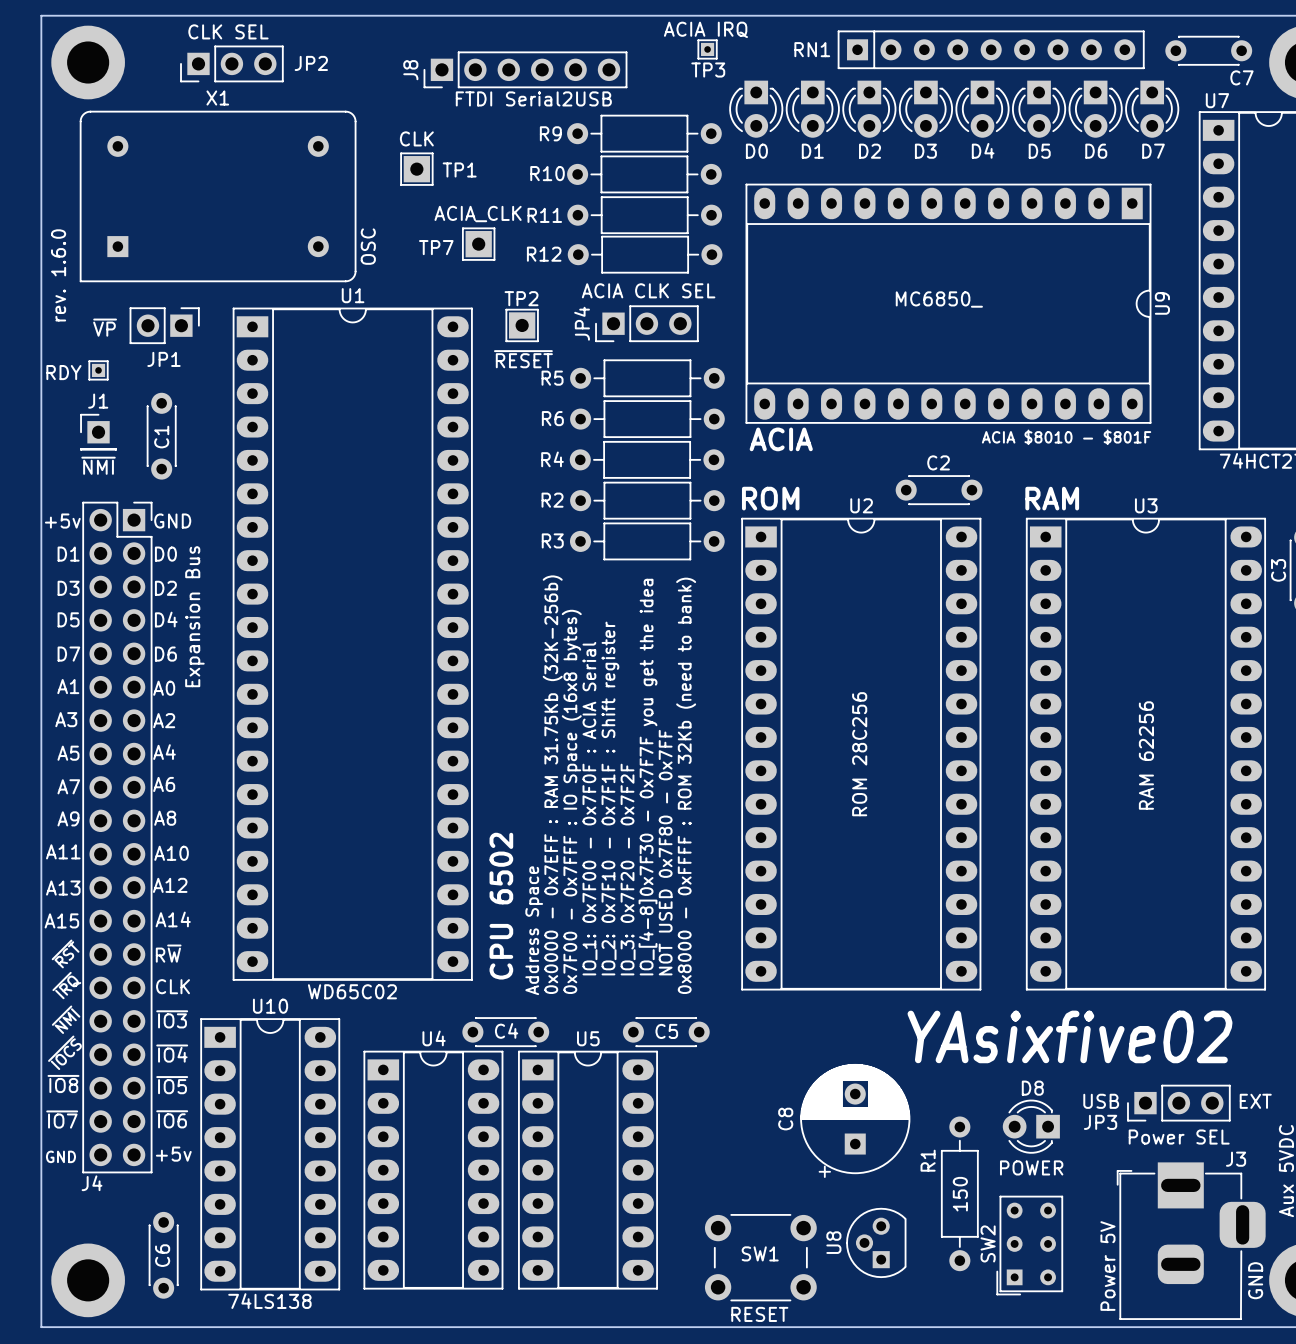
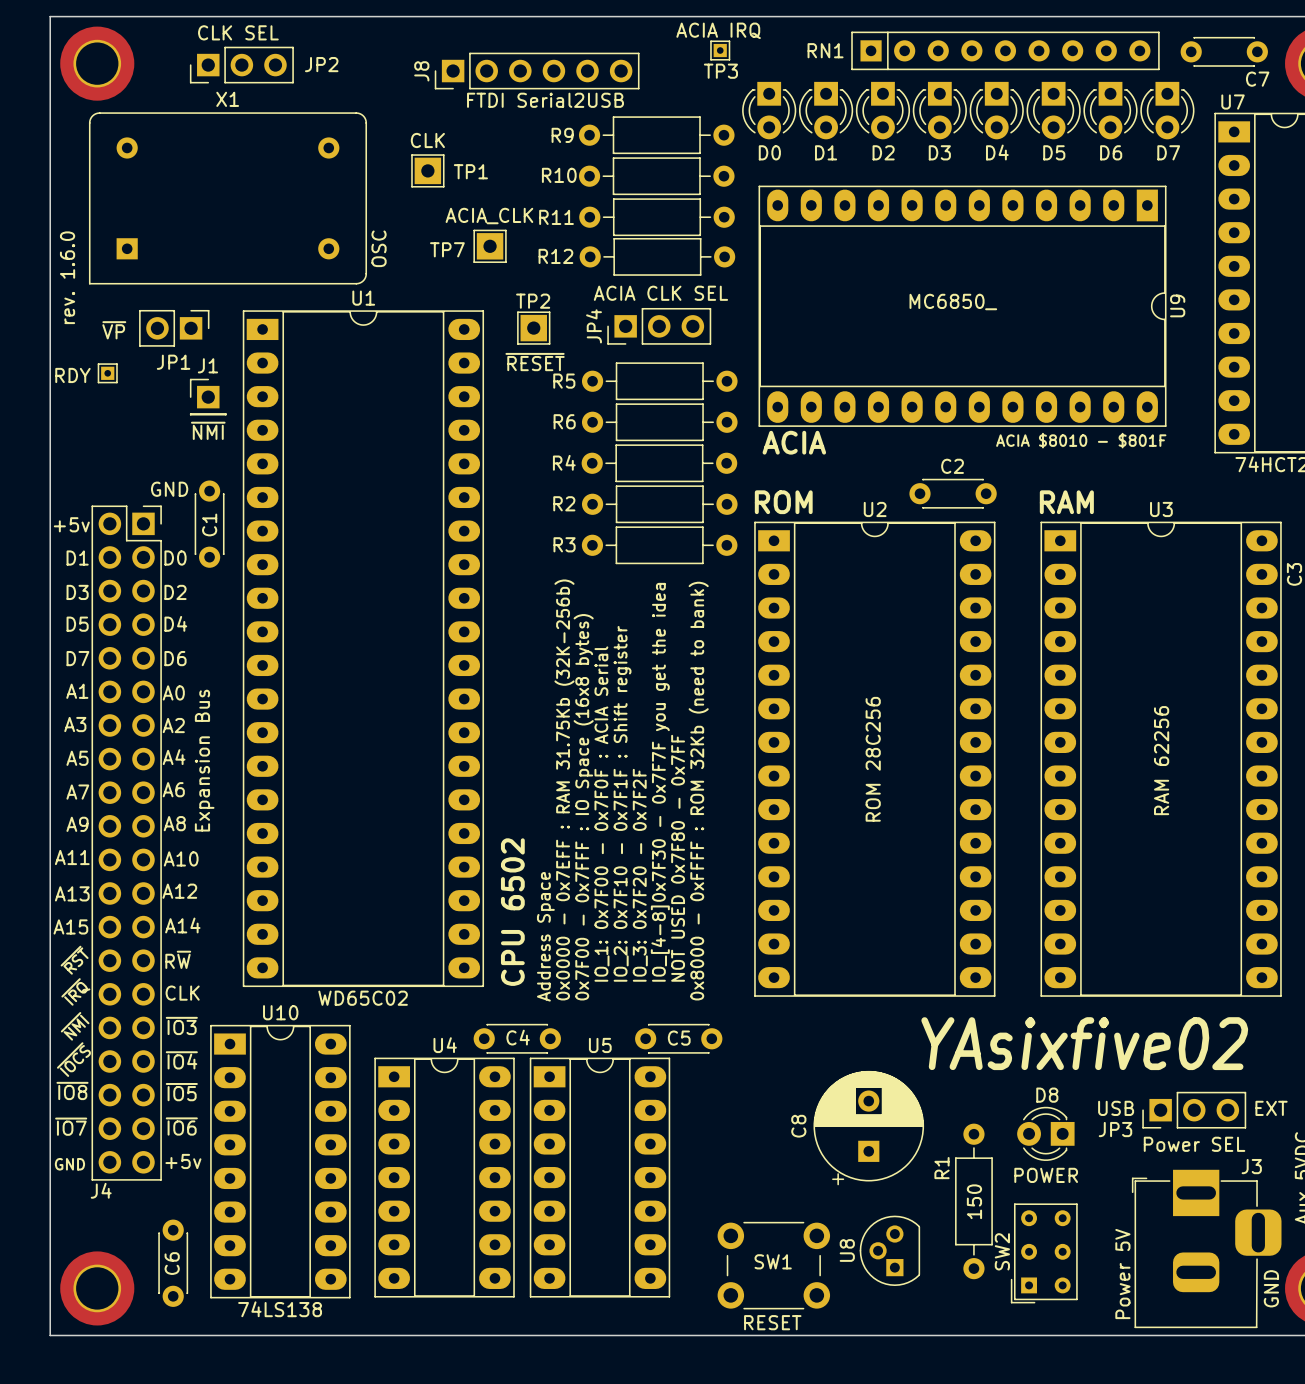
J1 position: (98, 432) -> (208, 397)
C1 position: (161, 436) -> (209, 524)
text position: GND (172, 521) -> GND (169, 489)
J4 value position: Expansion Bus (194, 616) -> Expansion Bus (204, 760)

